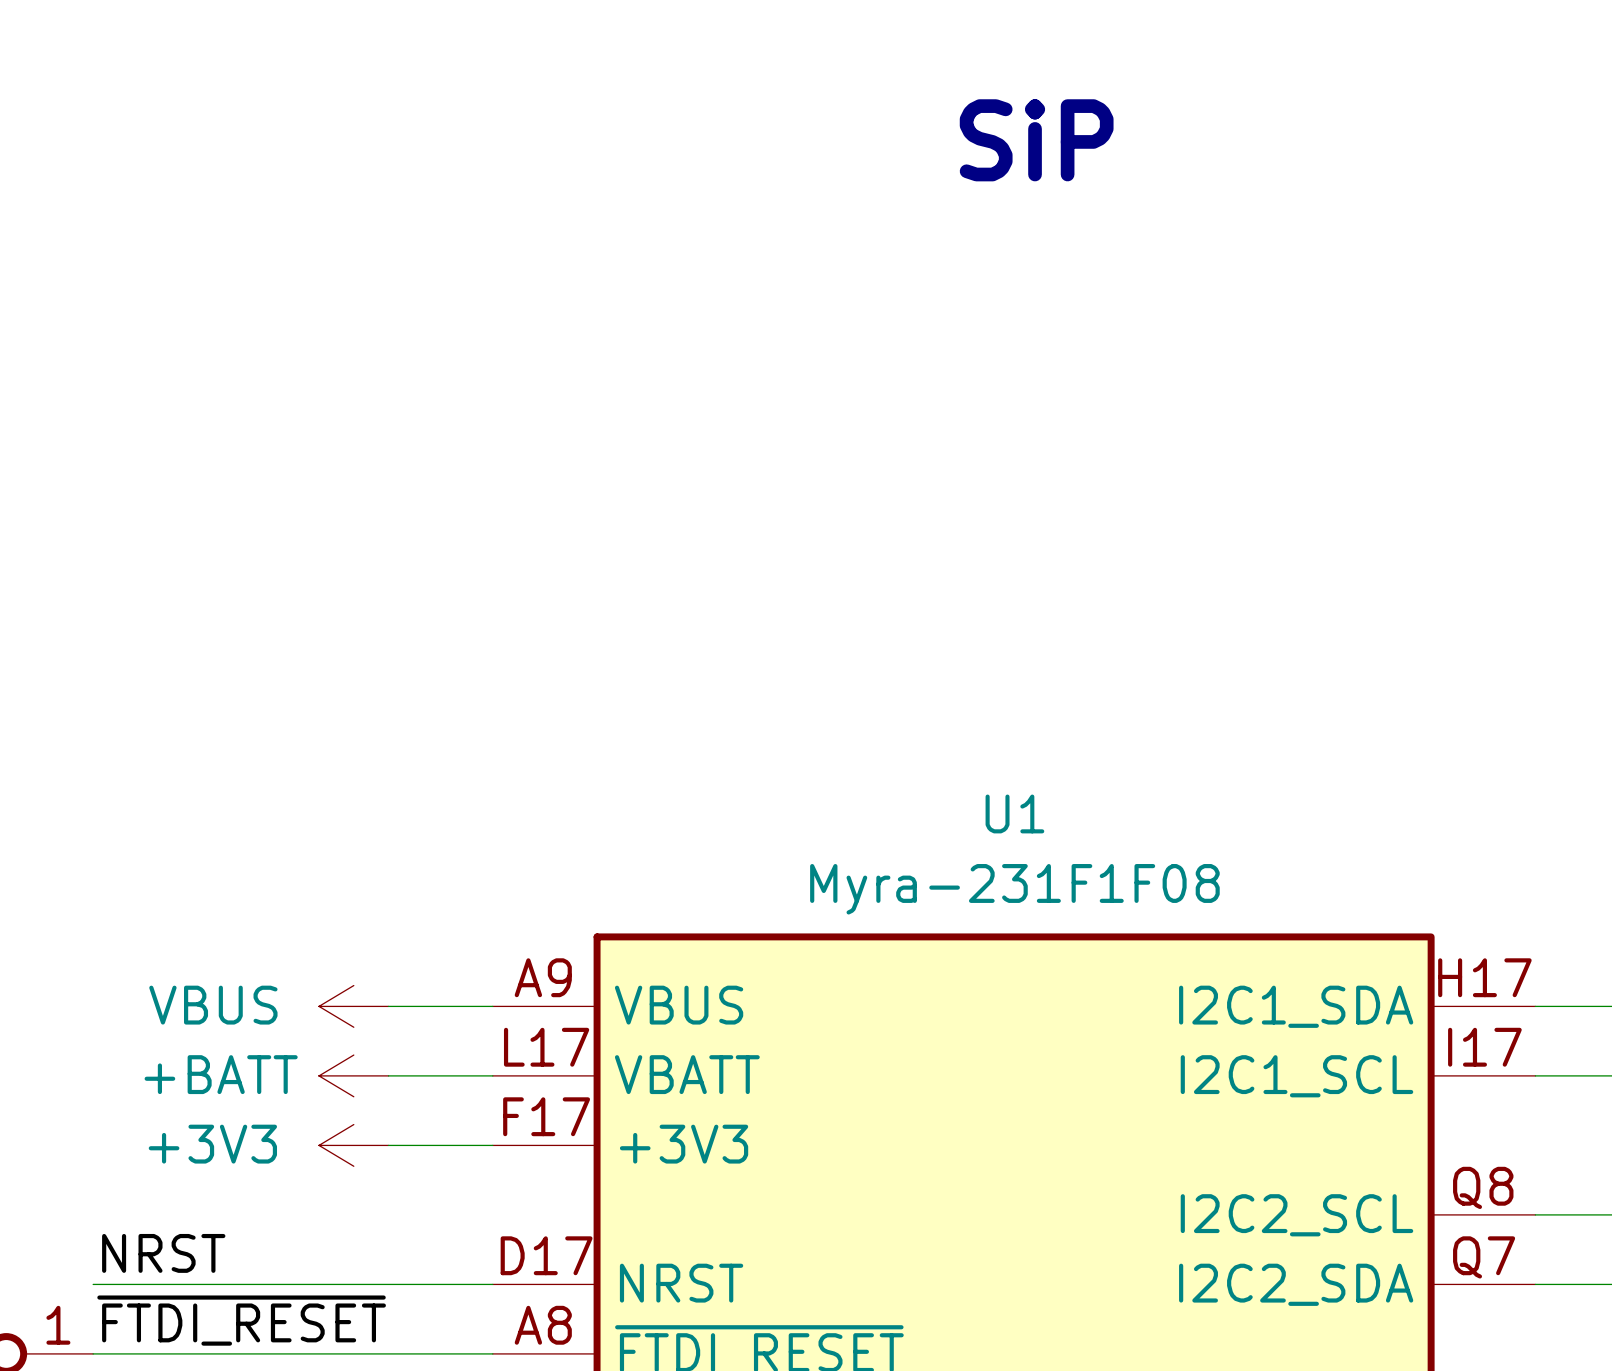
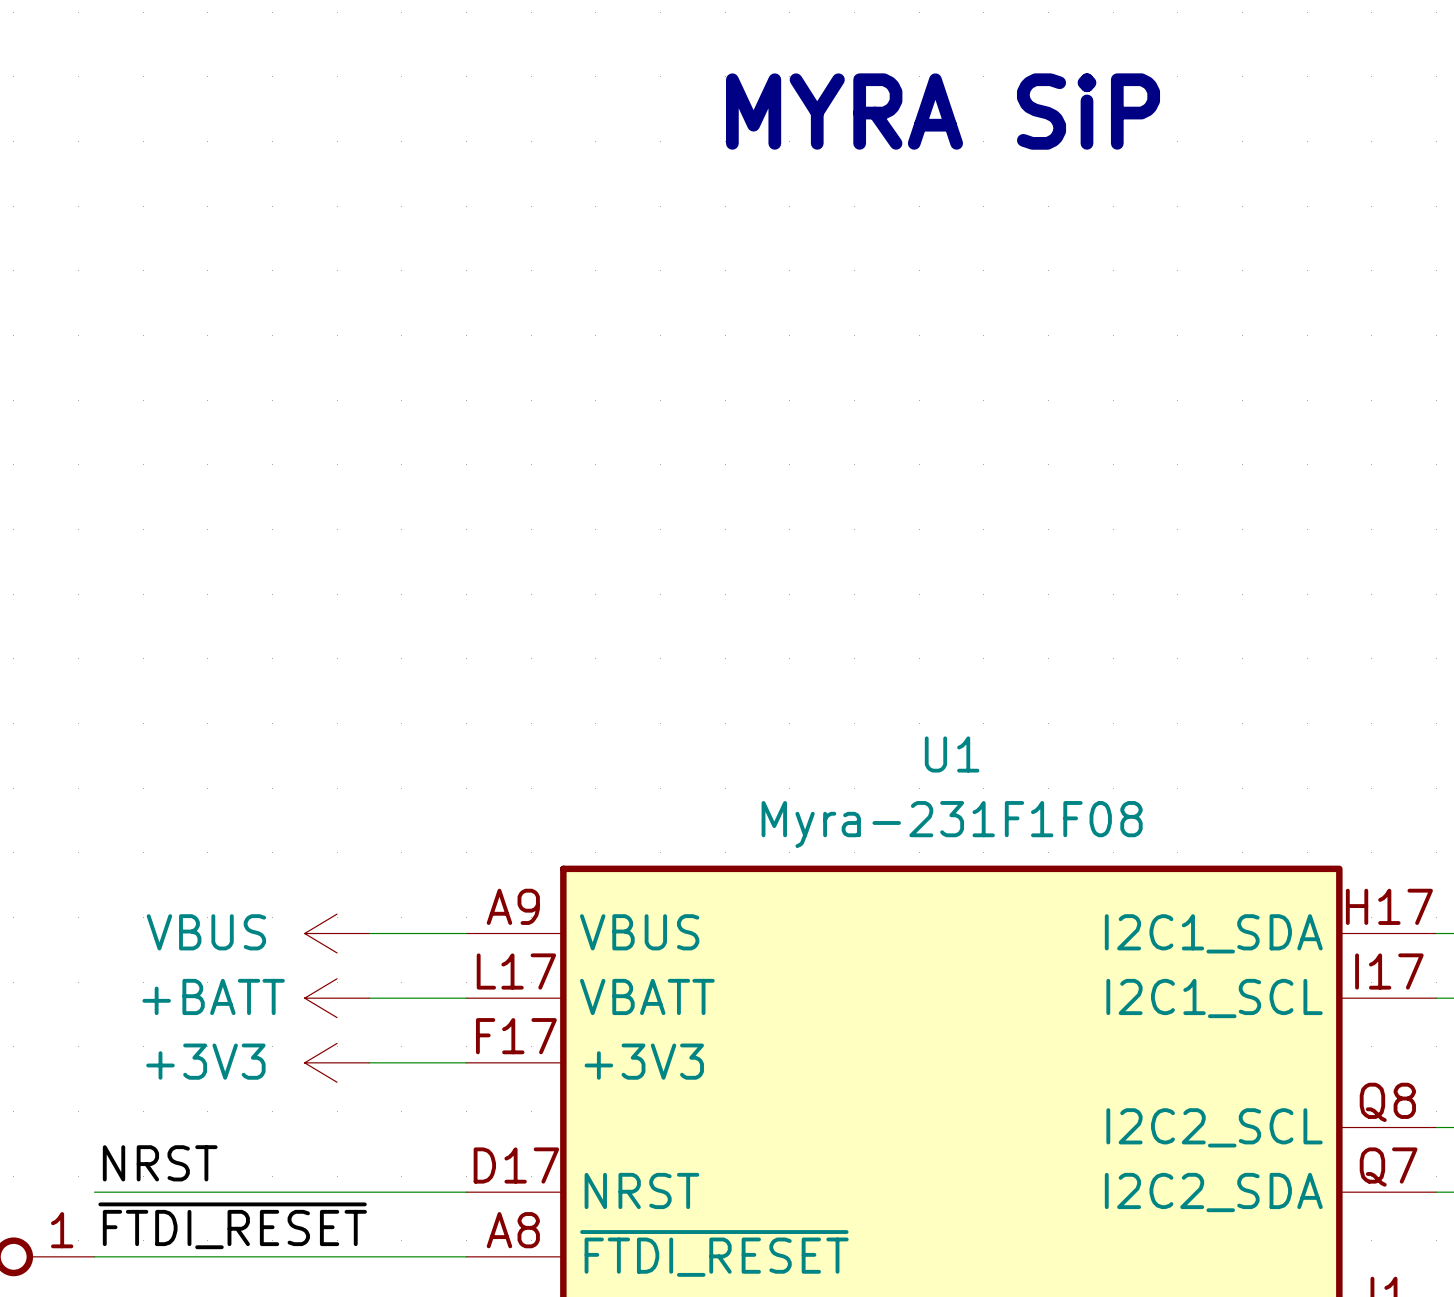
text: none -> MYRA SiP (943, 111)
text: SiP (1036, 140) -> none

